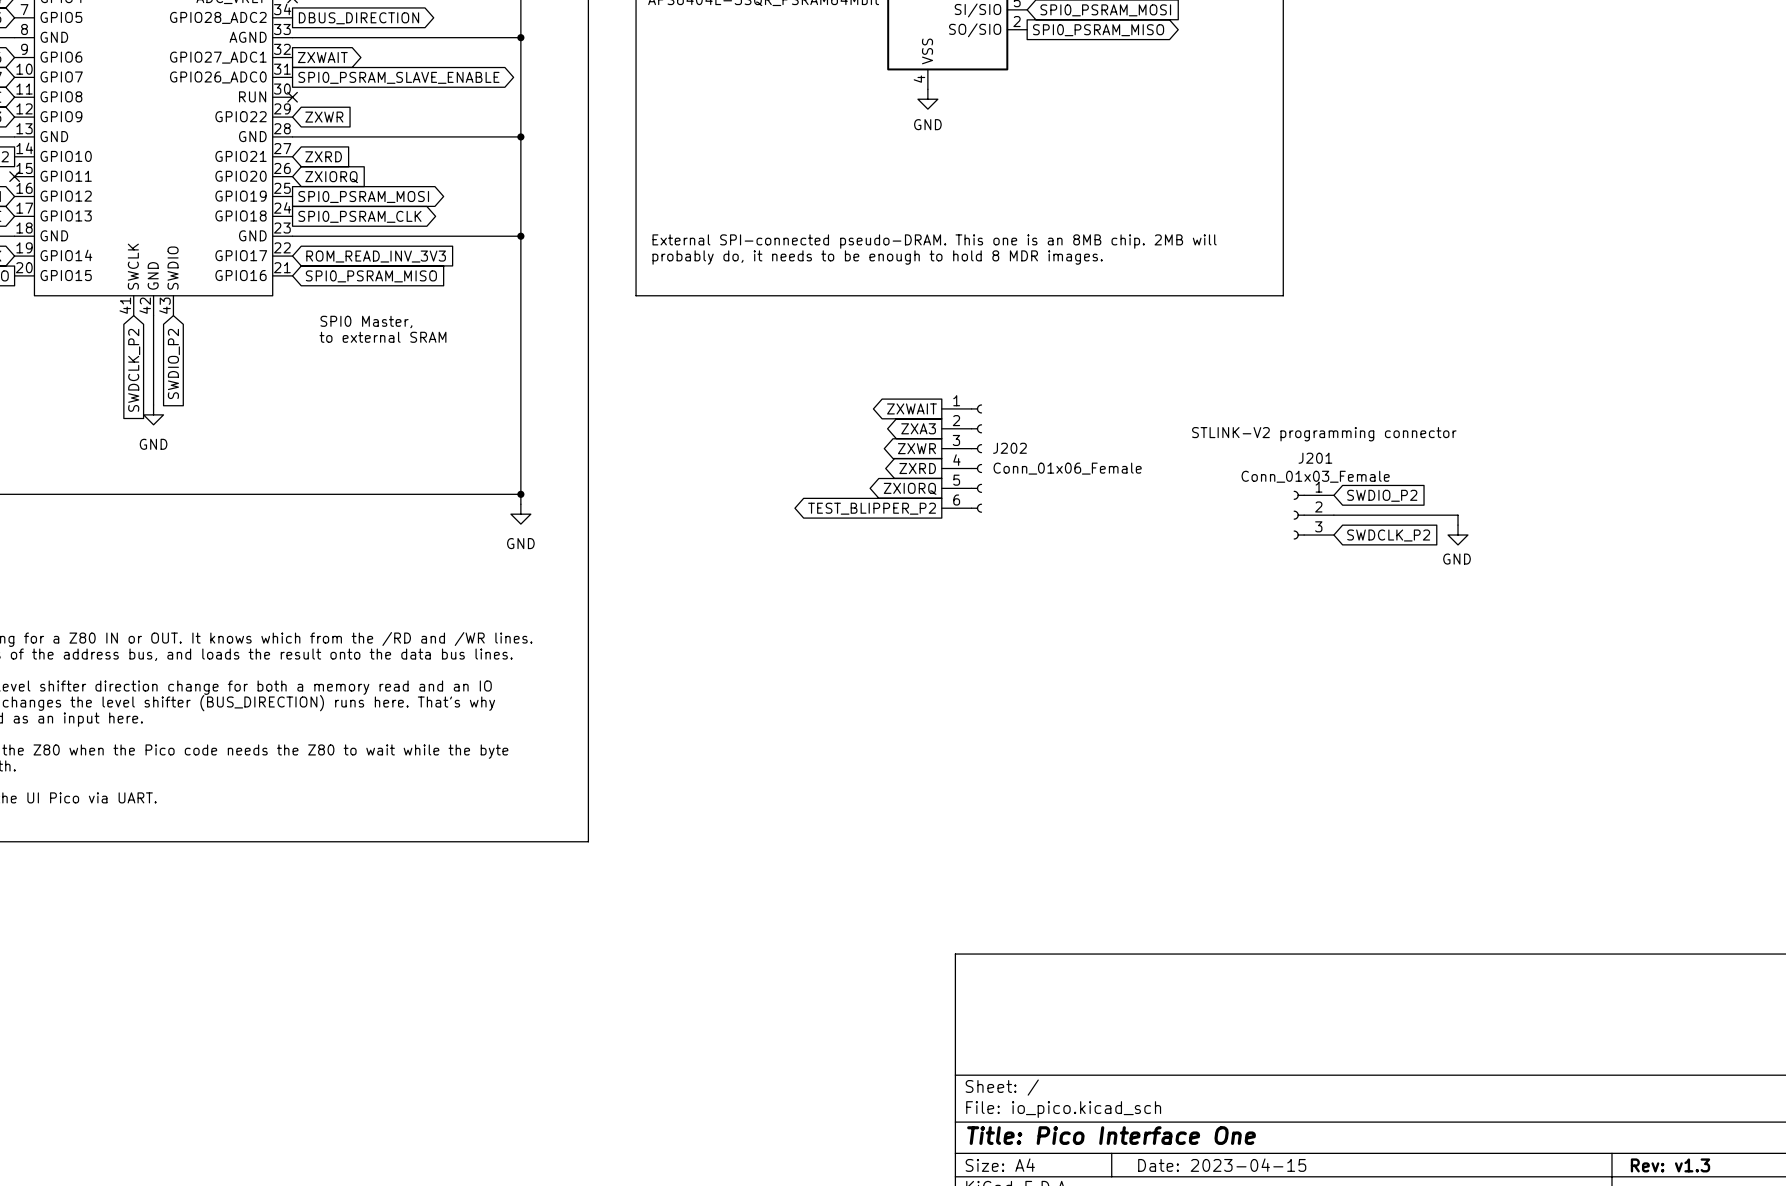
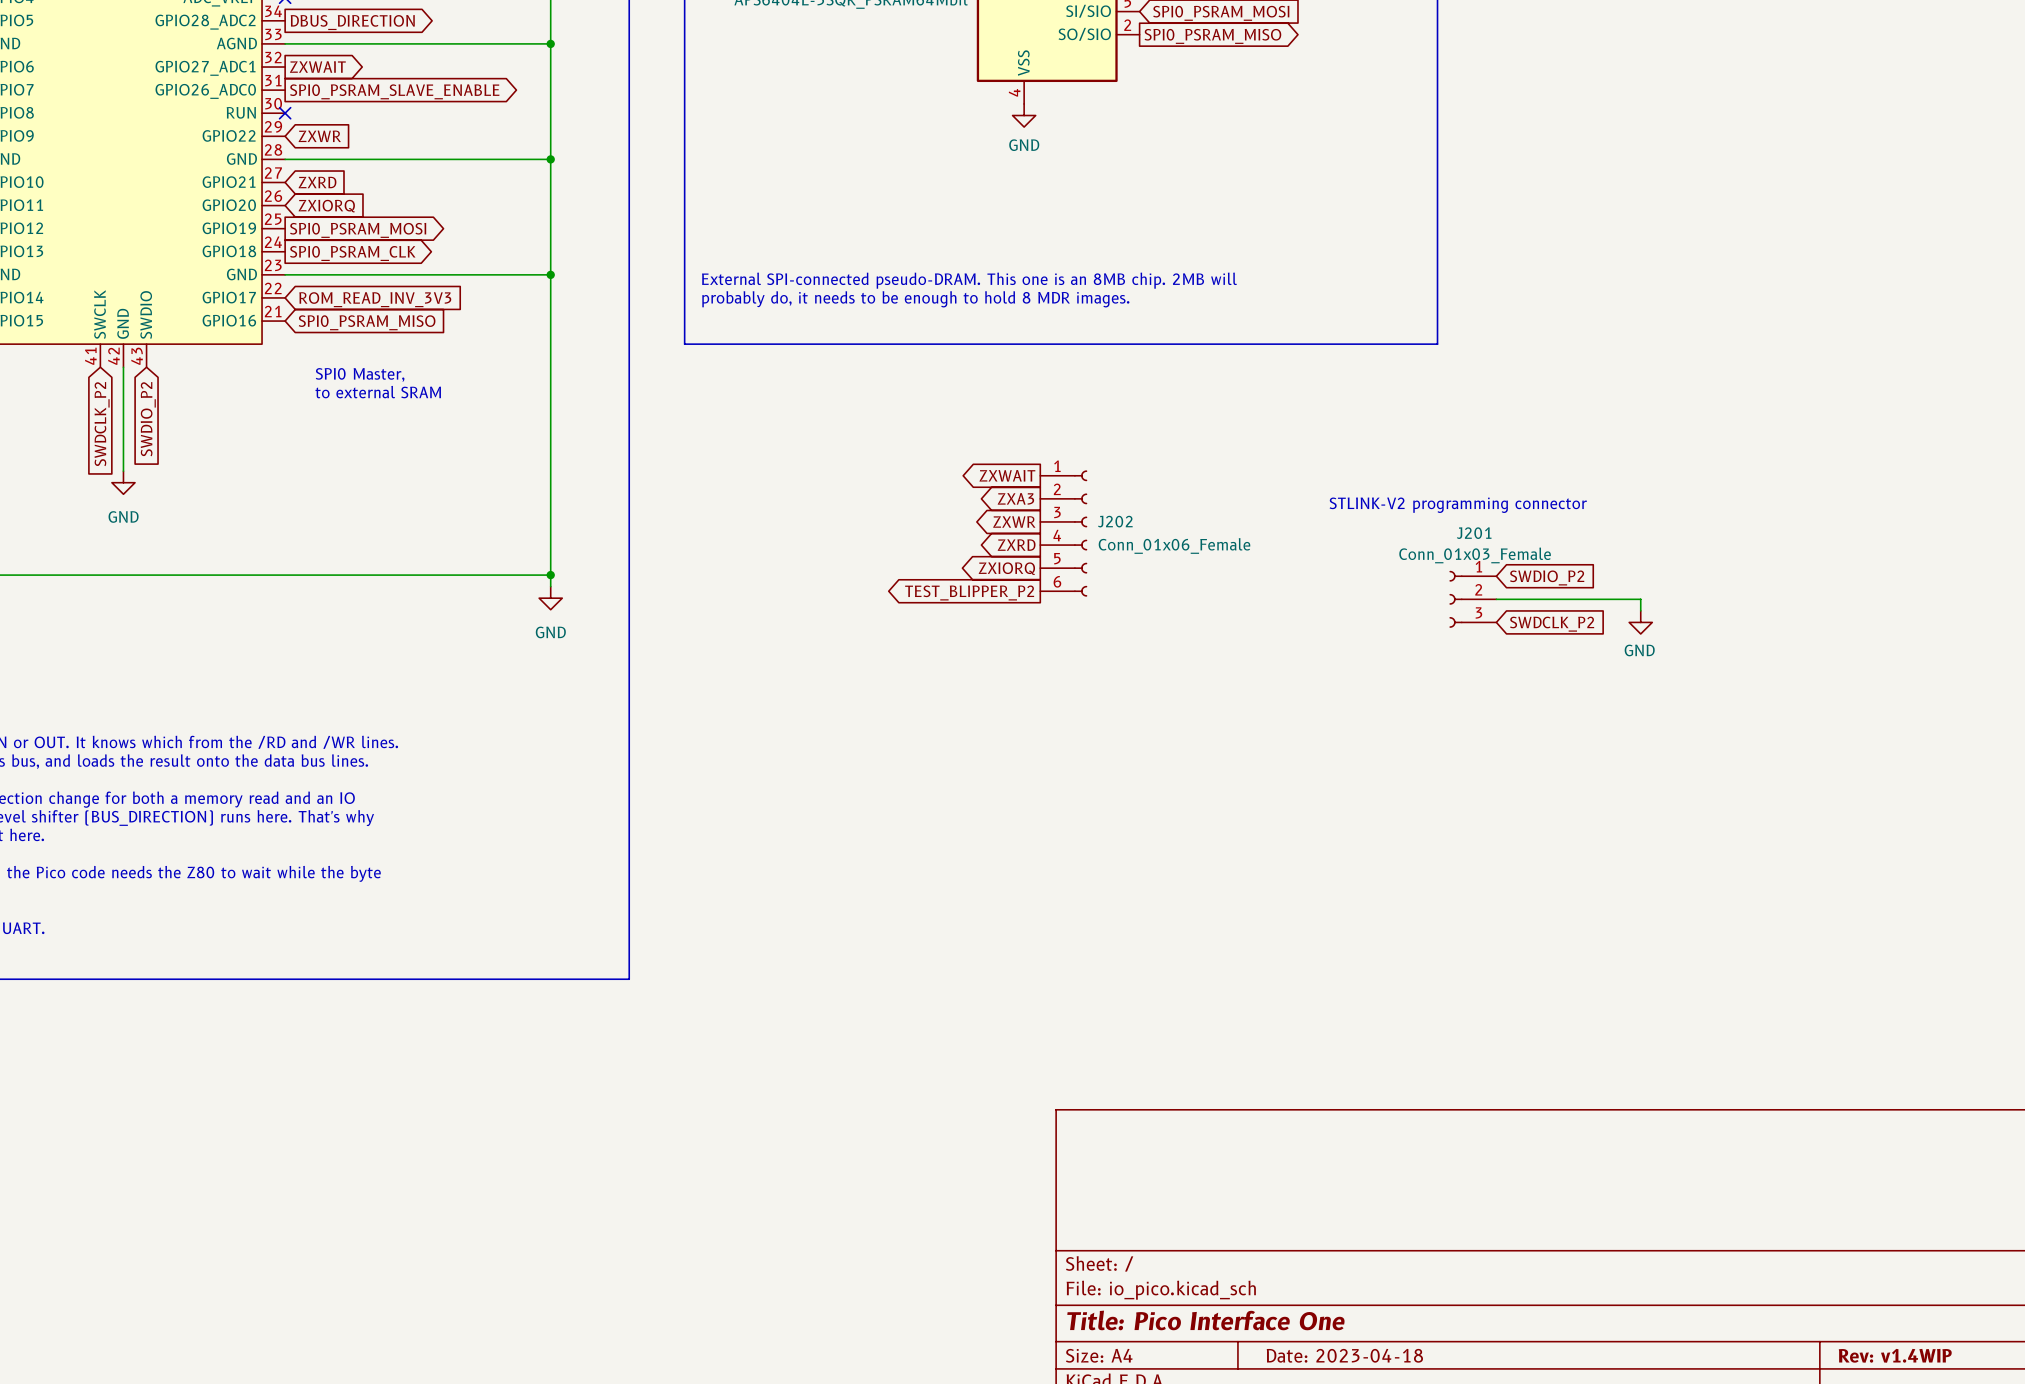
title block: Date: 2023-04-15 (1222, 1165) -> Date: 2023-04-18 (1344, 1355)
title block: Rev: v1.3 (1670, 1165) -> Rev: v1.4WIP (1895, 1355)

